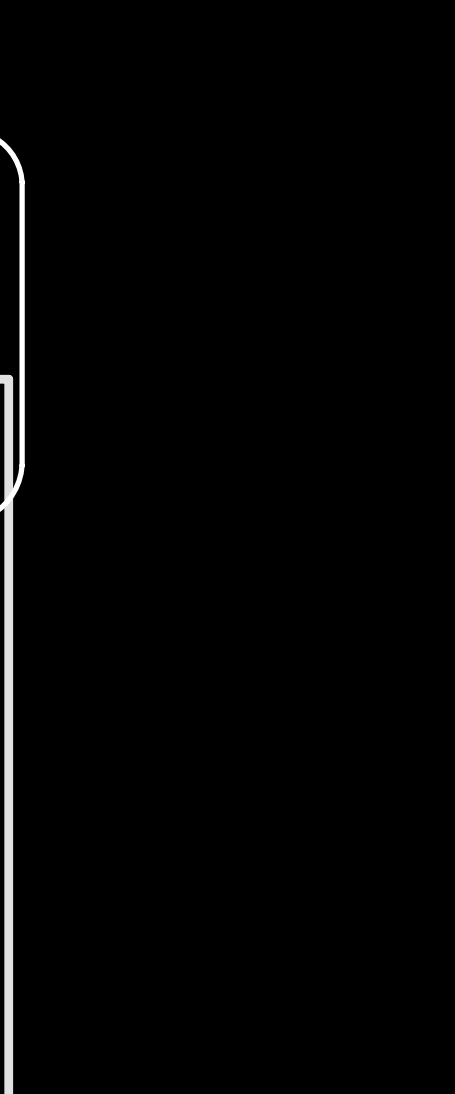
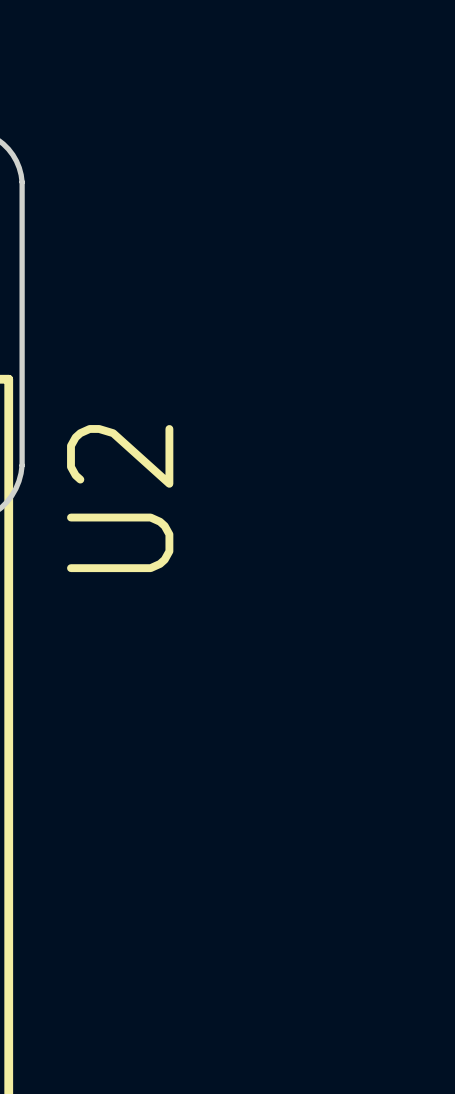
U2 name: none -> U2 (120, 498)

